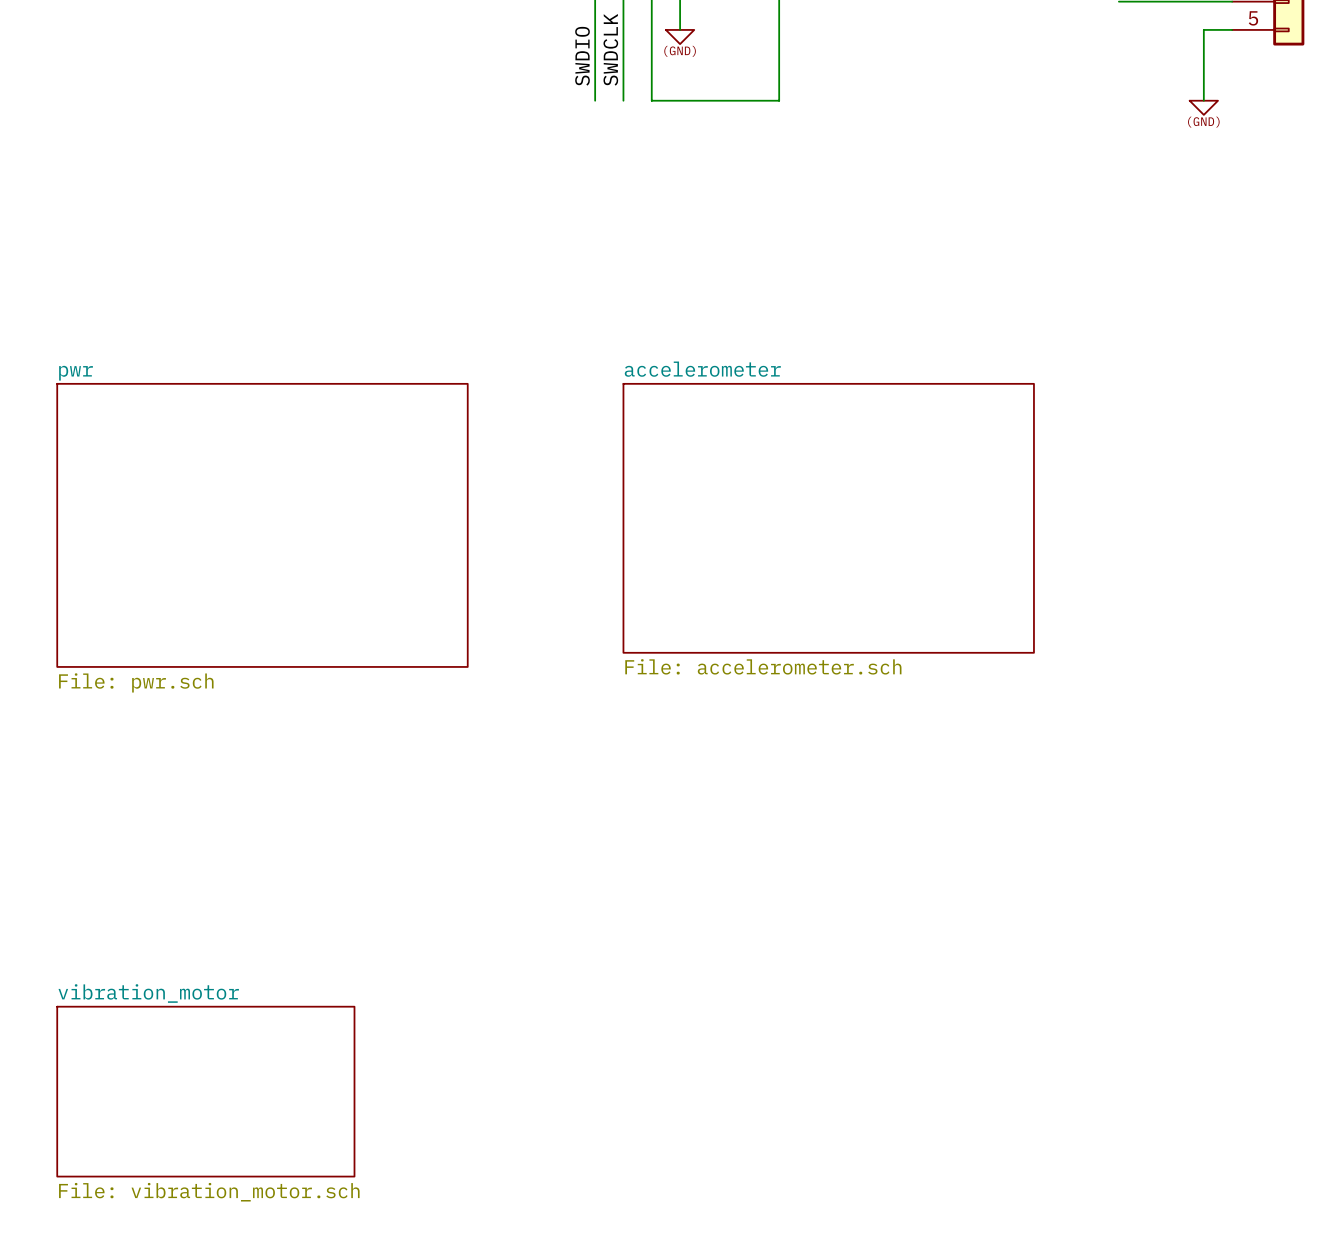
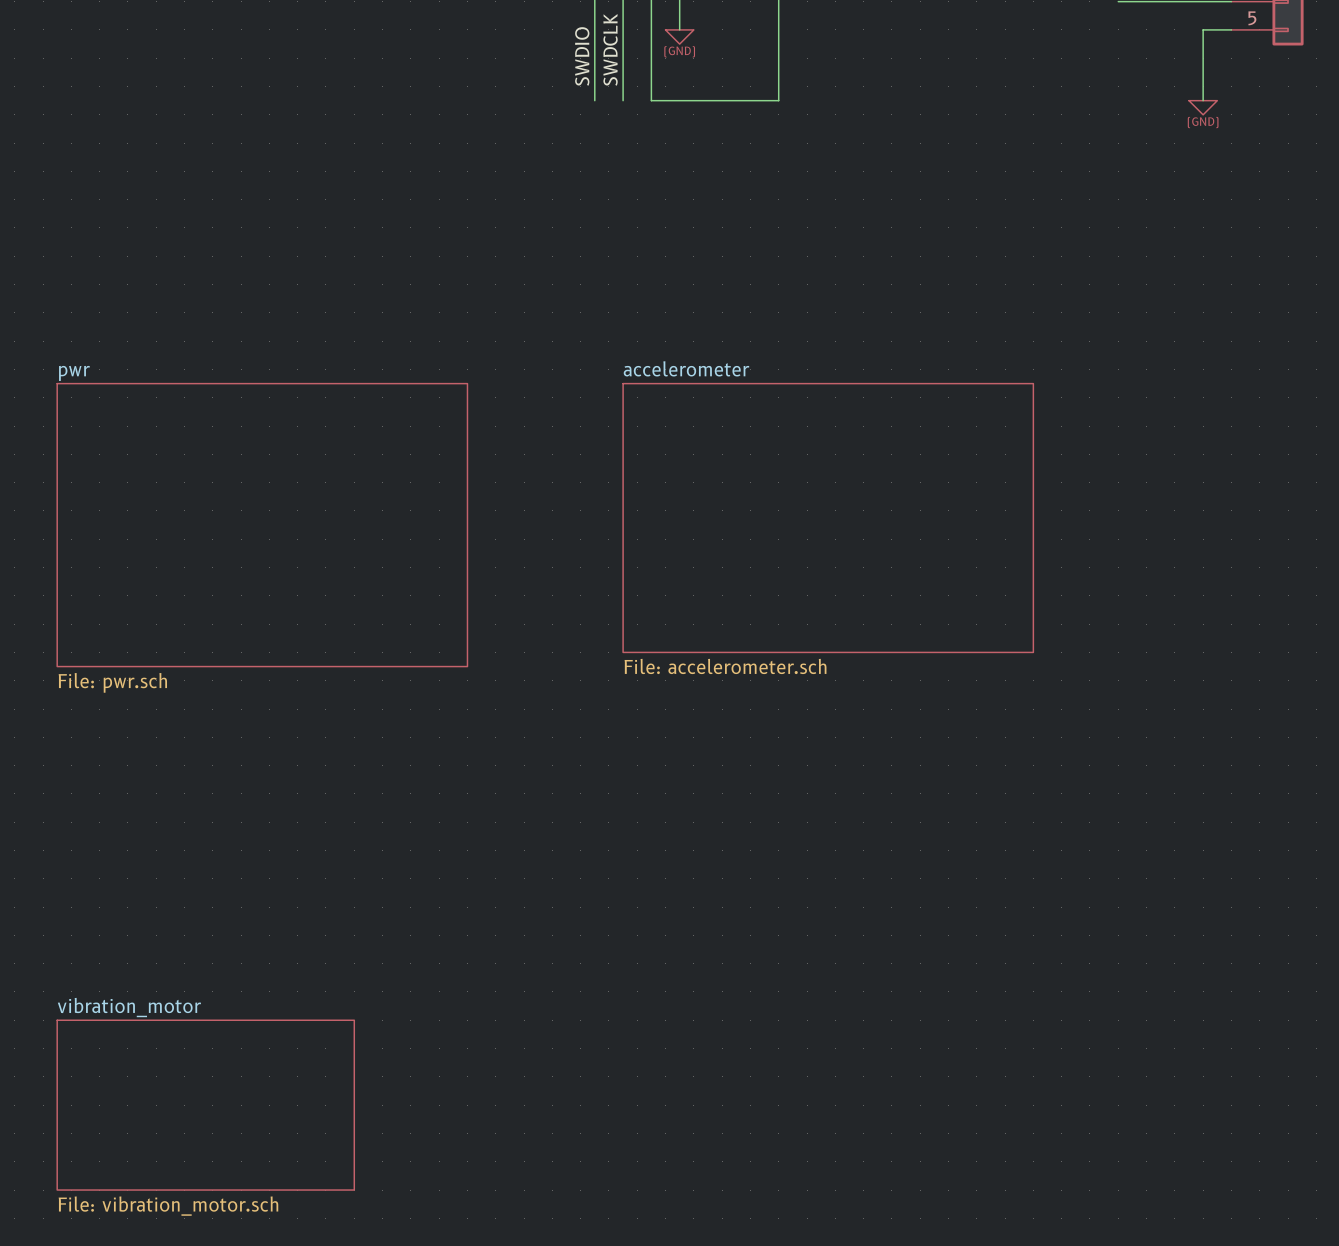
sheet vibration_motor position: (205, 1091) -> (205, 1105)

